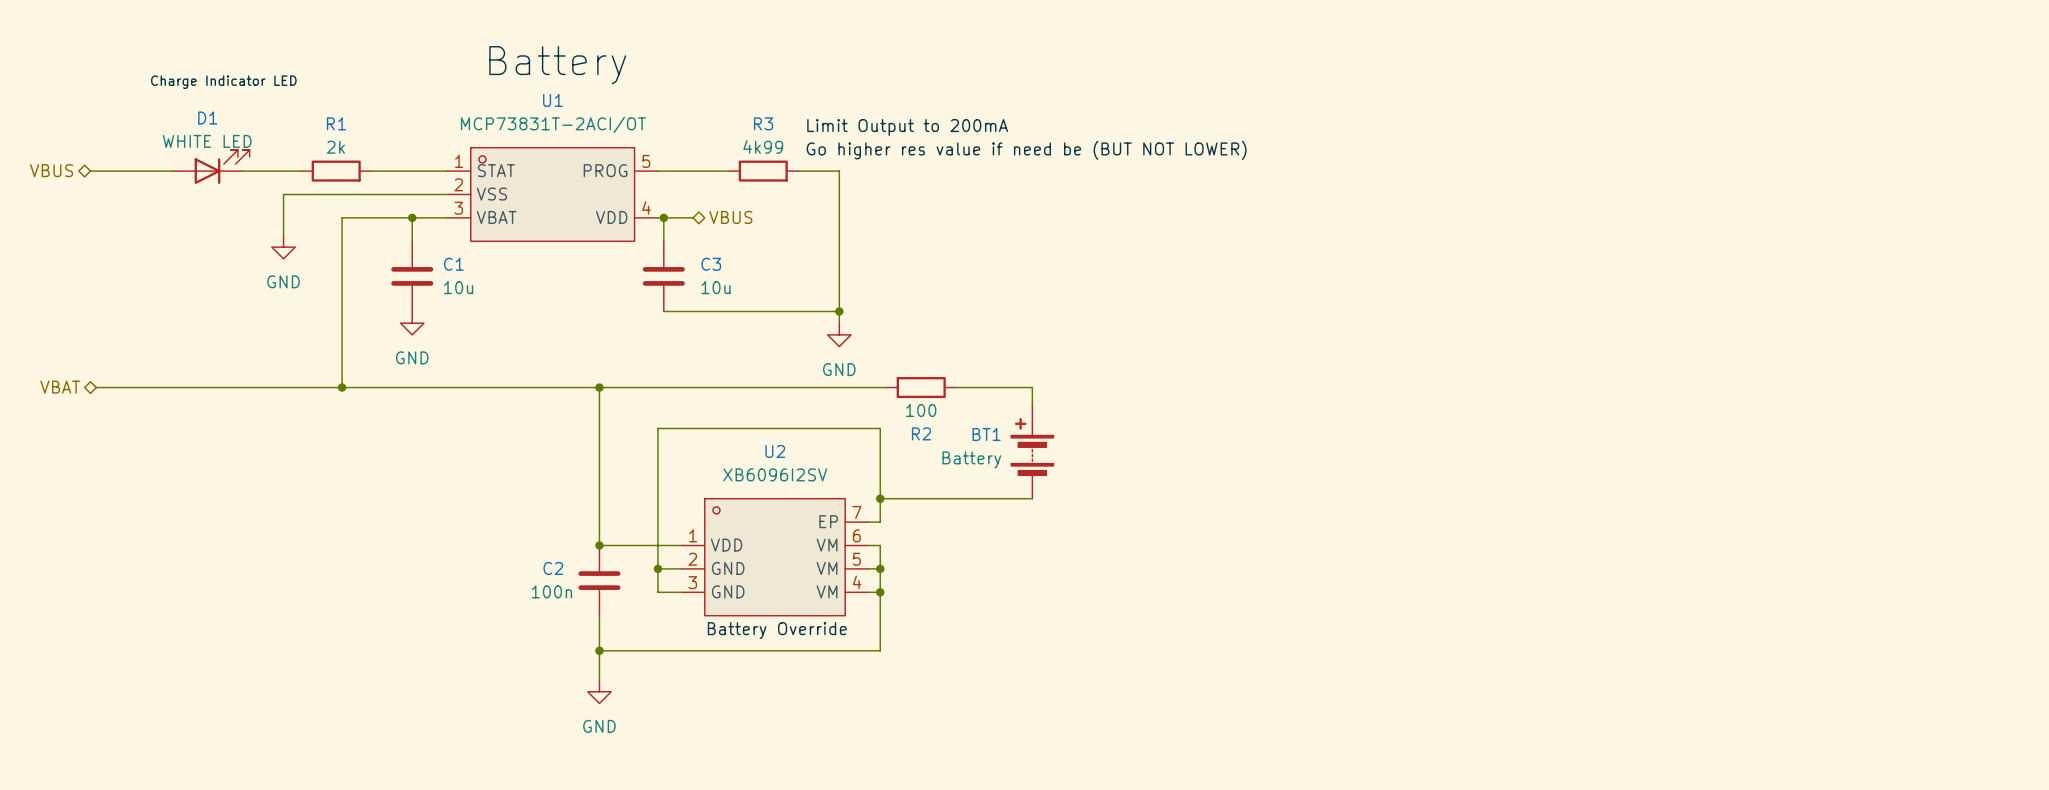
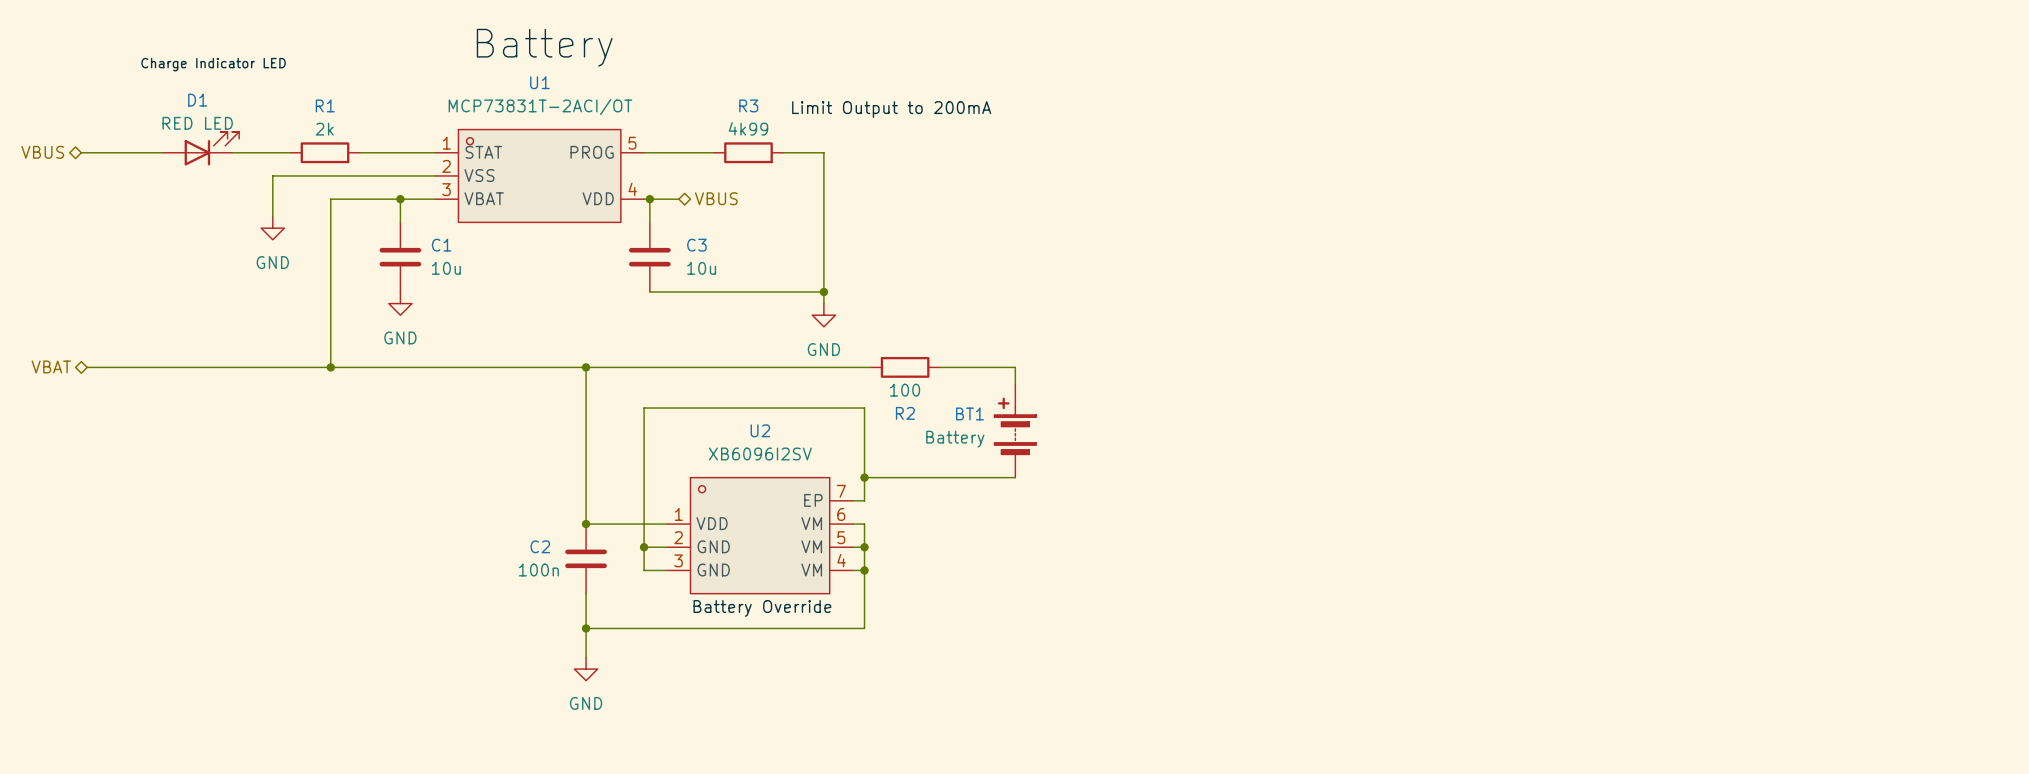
D1 value: WHITE LED (207, 141) -> RED LED (197, 123)
label: Go higher res value if need be (BUT NOT LOWER) (1026, 150) -> none

